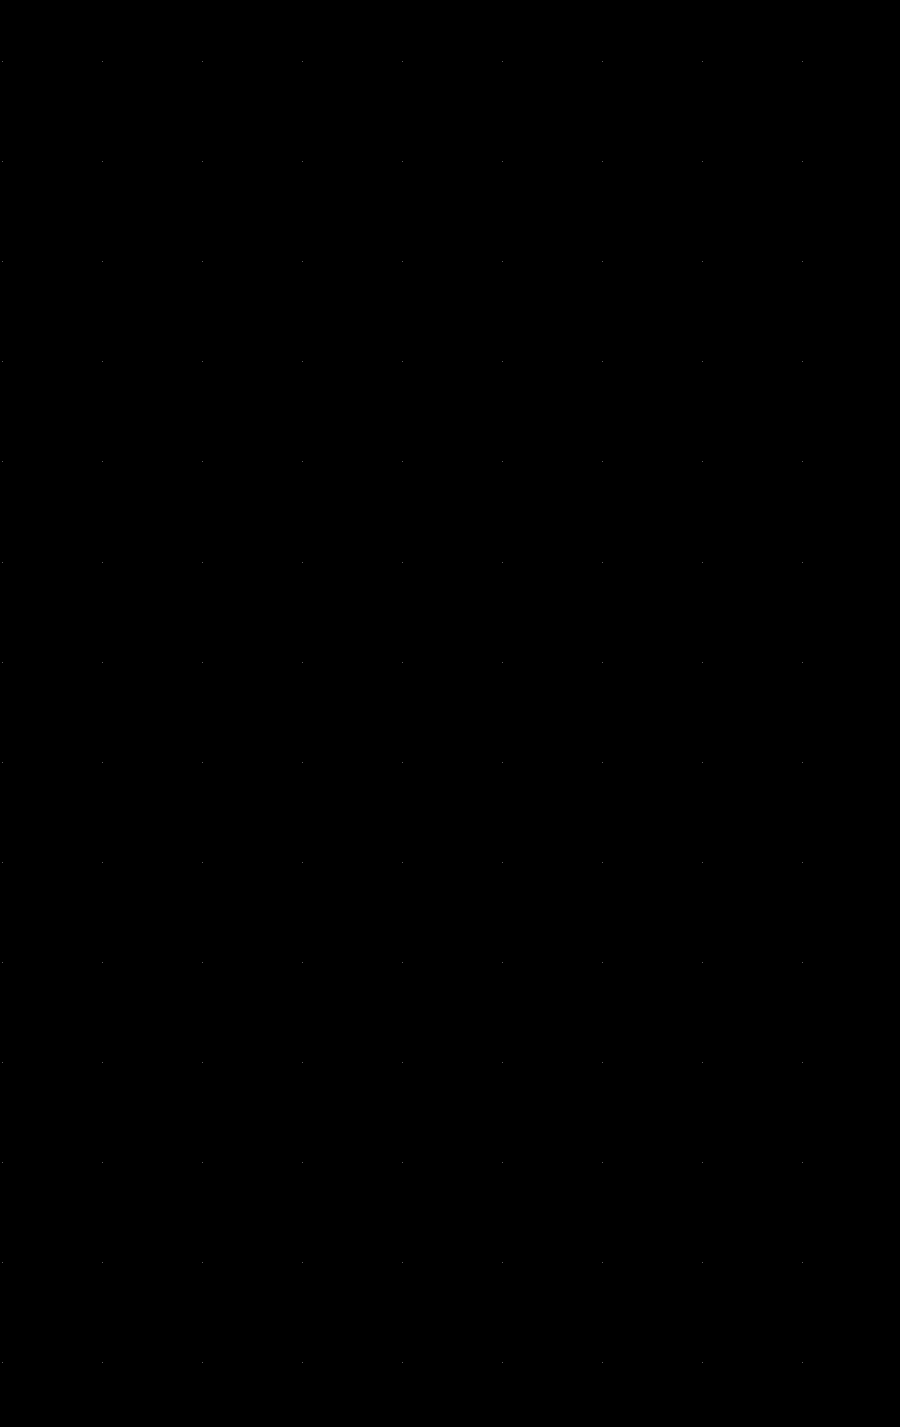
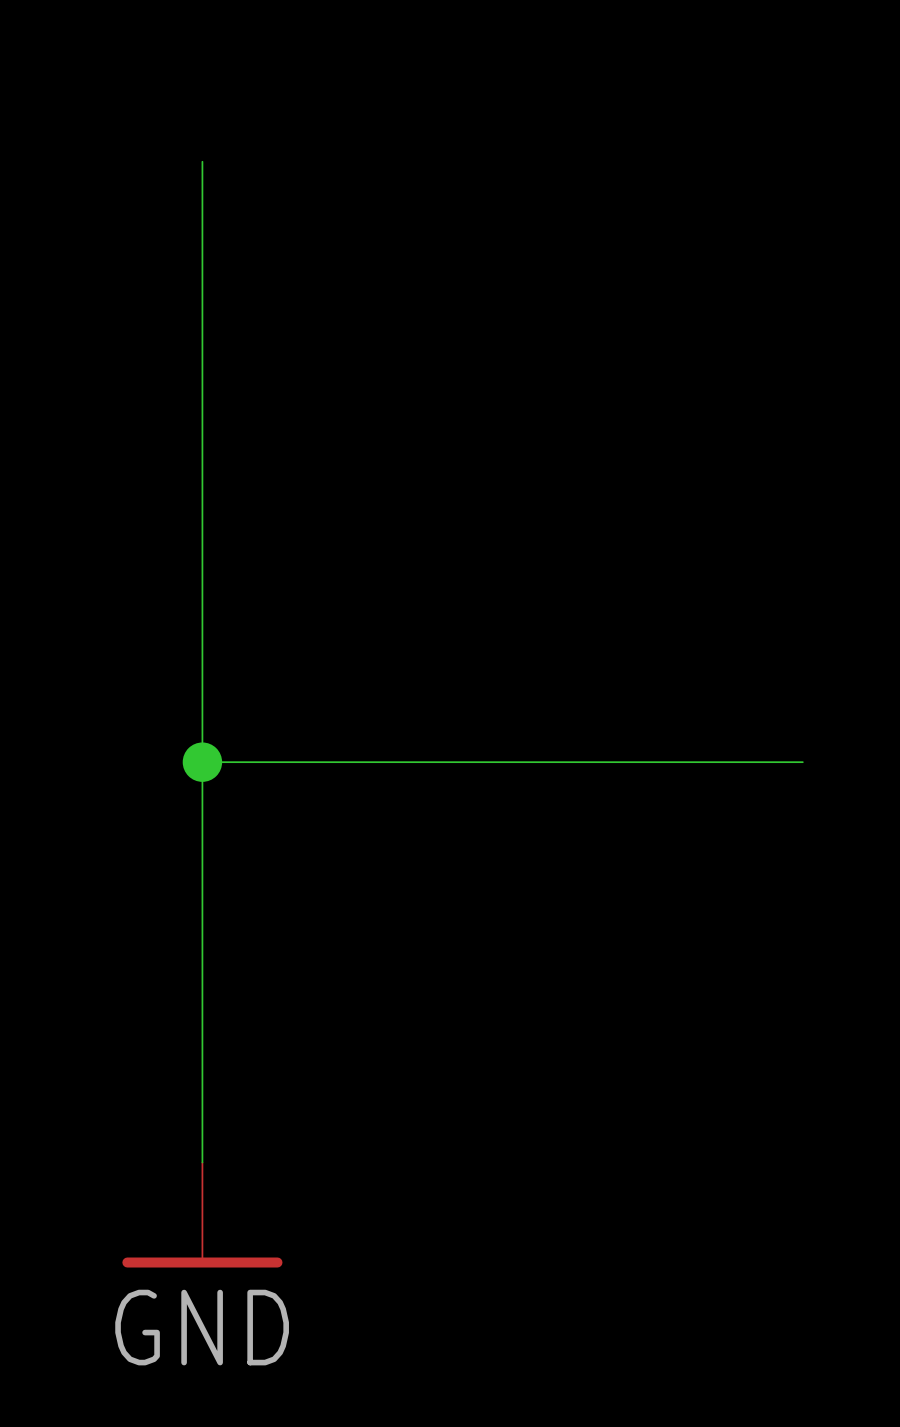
wire: none -> (202, 161) (202, 1162)
wire: none -> (202, 762) (802, 762)
junction: none -> (202, 762)
power symbol: none -> GND (202, 1214)

